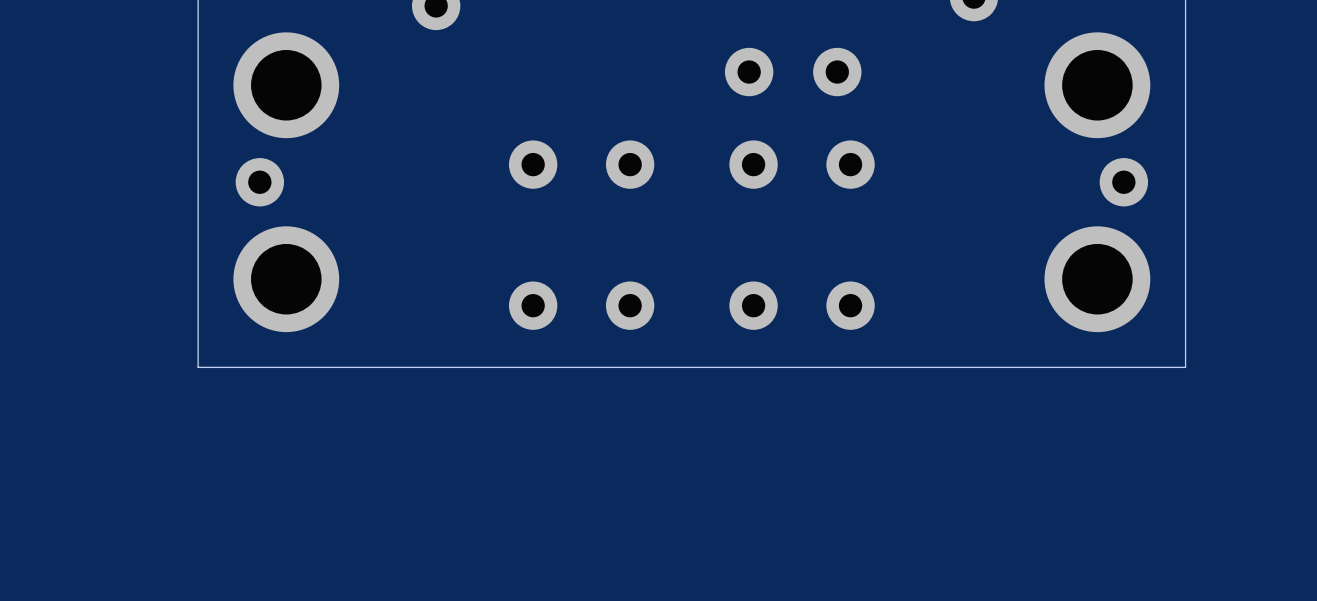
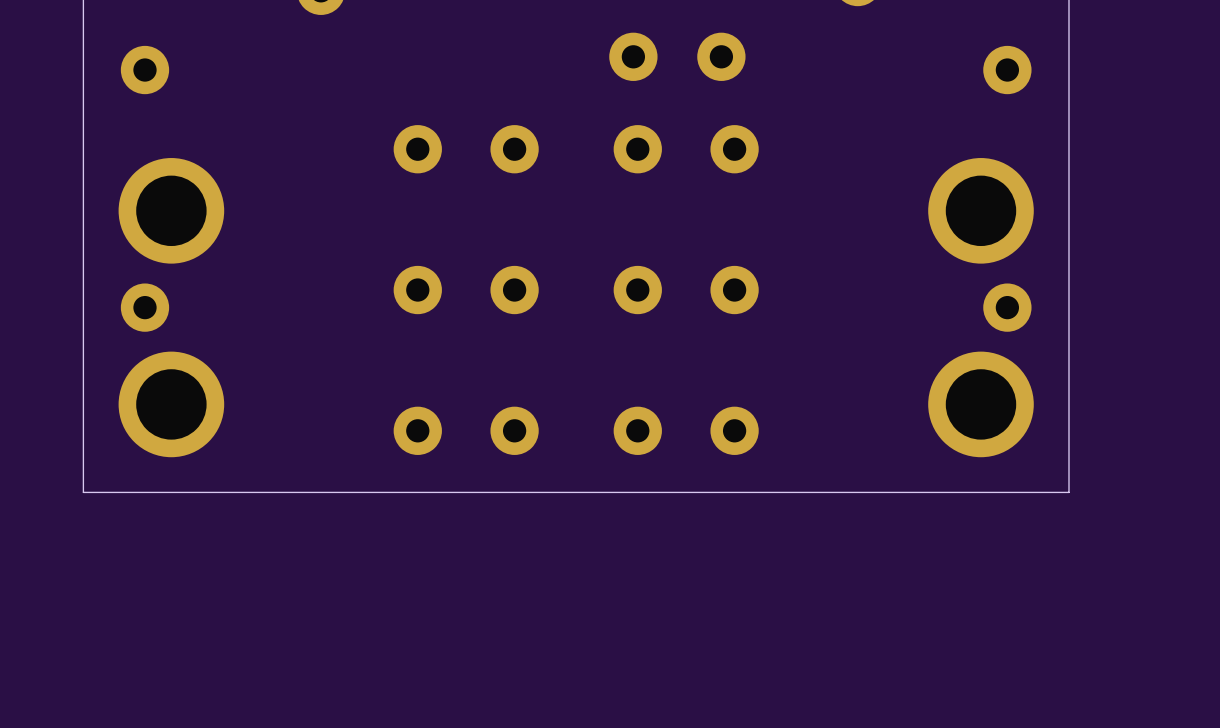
via size: [233, 32, 340, 139] -> [120, 45, 170, 95]
via size: [1044, 32, 1151, 139] -> [983, 45, 1032, 95]
via: (259, 182) -> none
via: (1123, 182) -> none
via position: (286, 279) -> (171, 210)
via position: (1097, 279) -> (980, 210)
via: none -> (144, 307)
via: none -> (1007, 307)
board edge: (1185, 367) (198, 367) -> (1068, 351) (1068, 492) (83, 492) (83, 351)
via: none -> (171, 404)
via: none -> (980, 404)
via: none -> (417, 430)
via: none -> (514, 430)
via: none -> (637, 430)
via: none -> (734, 430)

